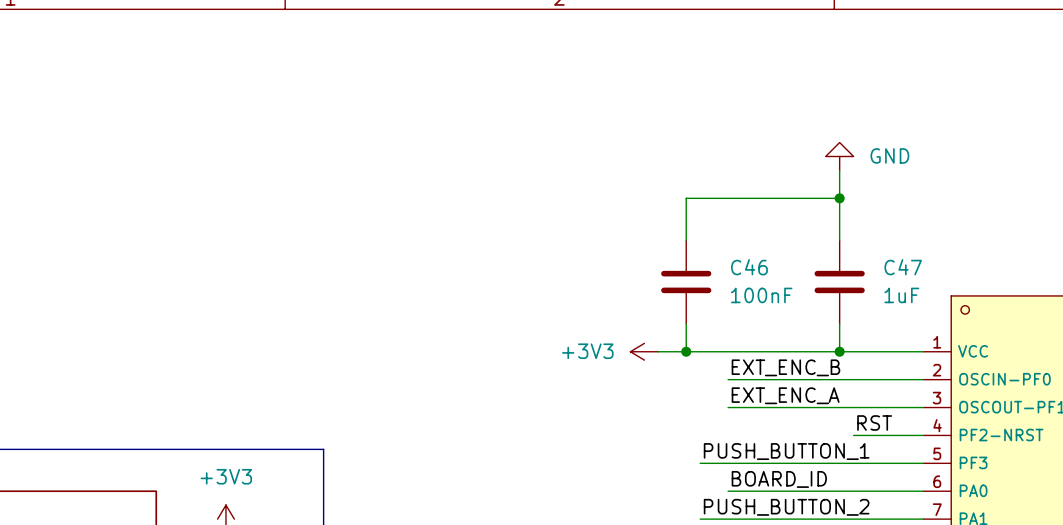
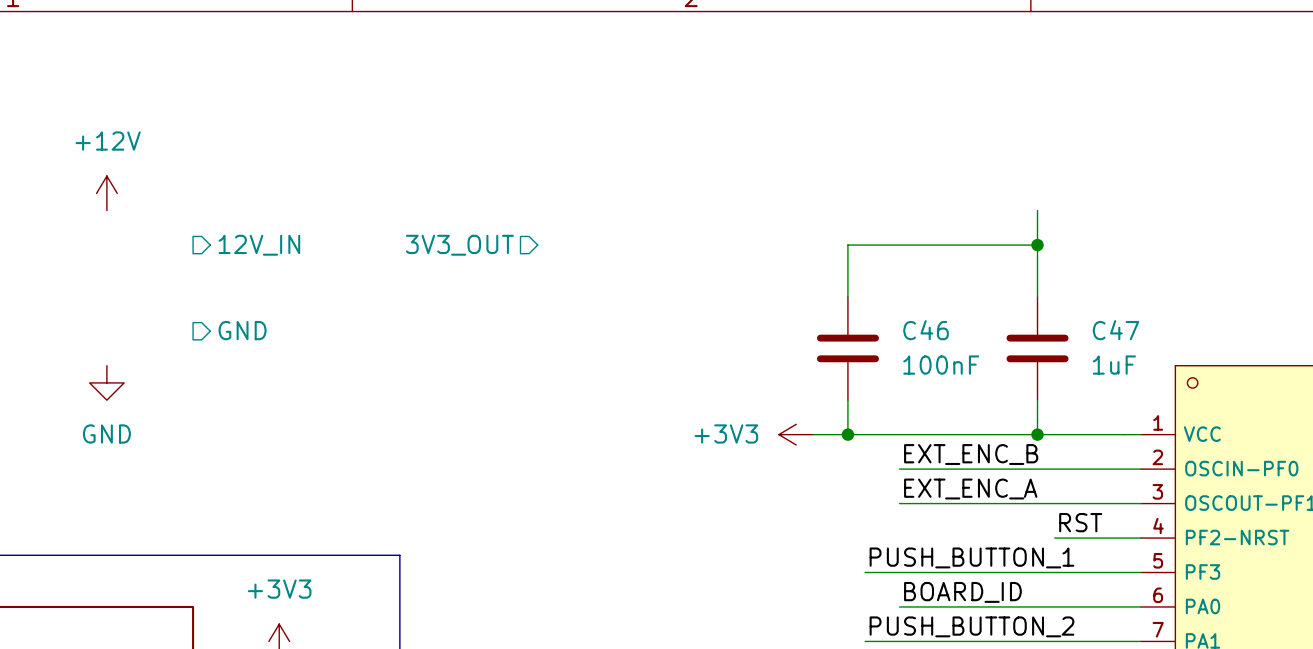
power symbol: none -> +12V (106, 193)
power symbol: GND (839, 156) -> none
sheet pin: none -> 12V_IN (259, 245)
sheet pin: none -> 3V3_OUT (459, 245)
sheet pin: none -> GND (242, 330)
power symbol: none -> GND (106, 382)

